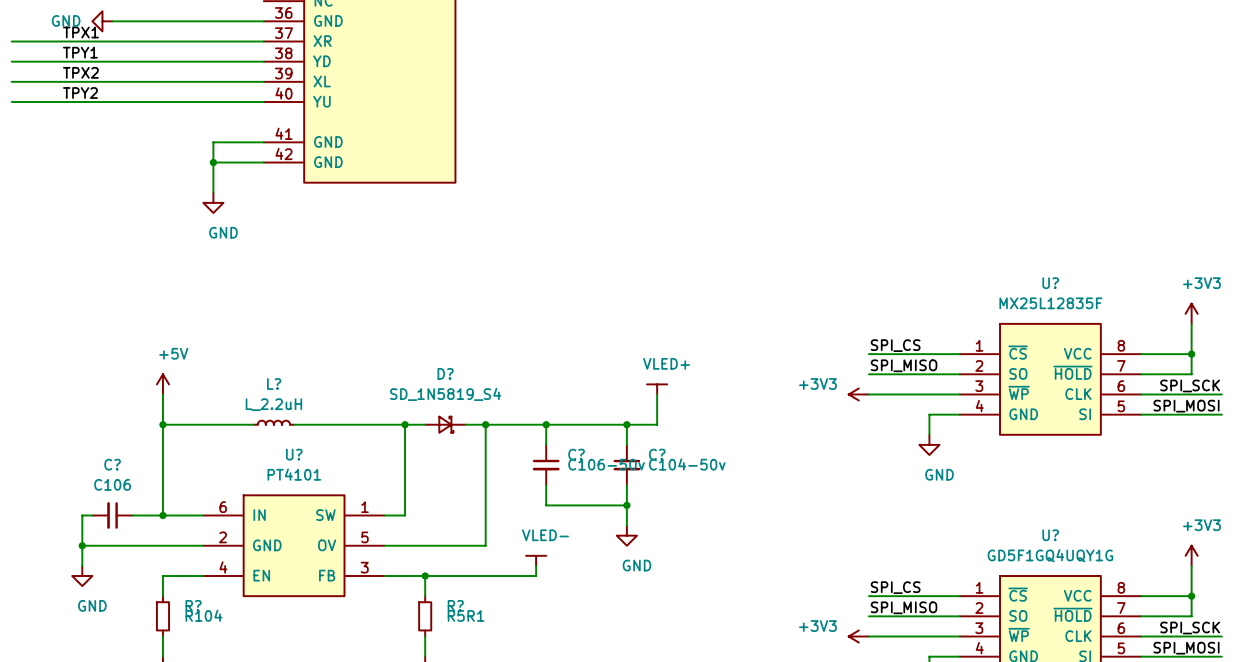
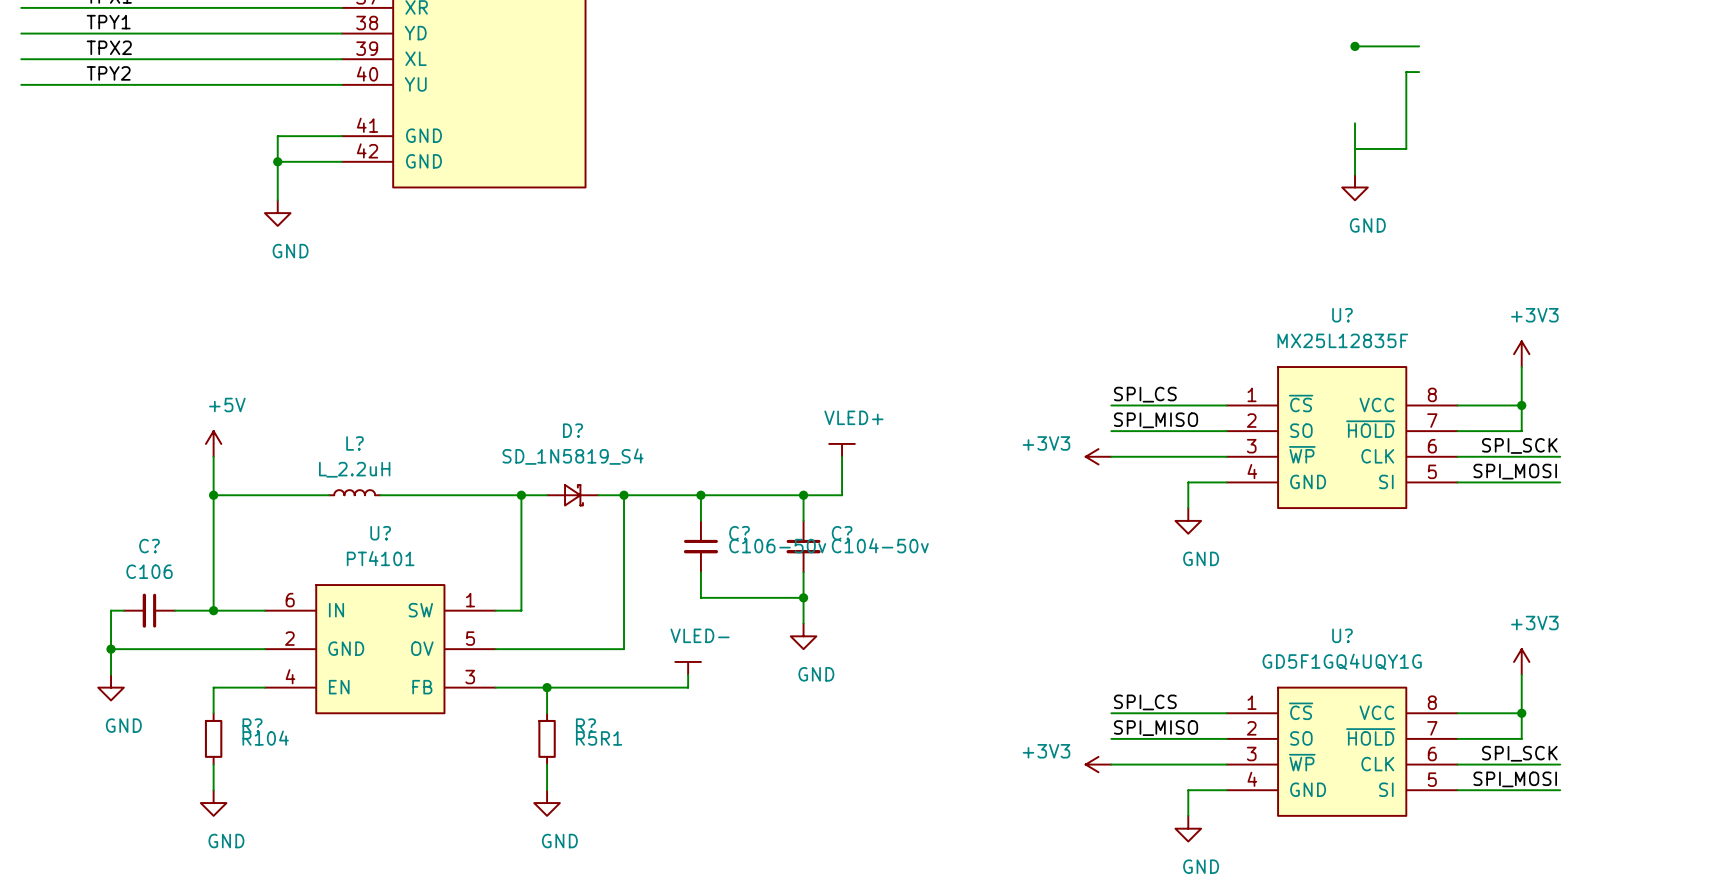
wire: none -> (1355, 46) (1419, 46)
junction: none -> (1355, 46)
wire: none -> (1419, 72) (1406, 72) (1406, 148) (1355, 148)
wire: none -> (1355, 123) (1355, 174)
power symbol: none -> GND (1355, 187)

